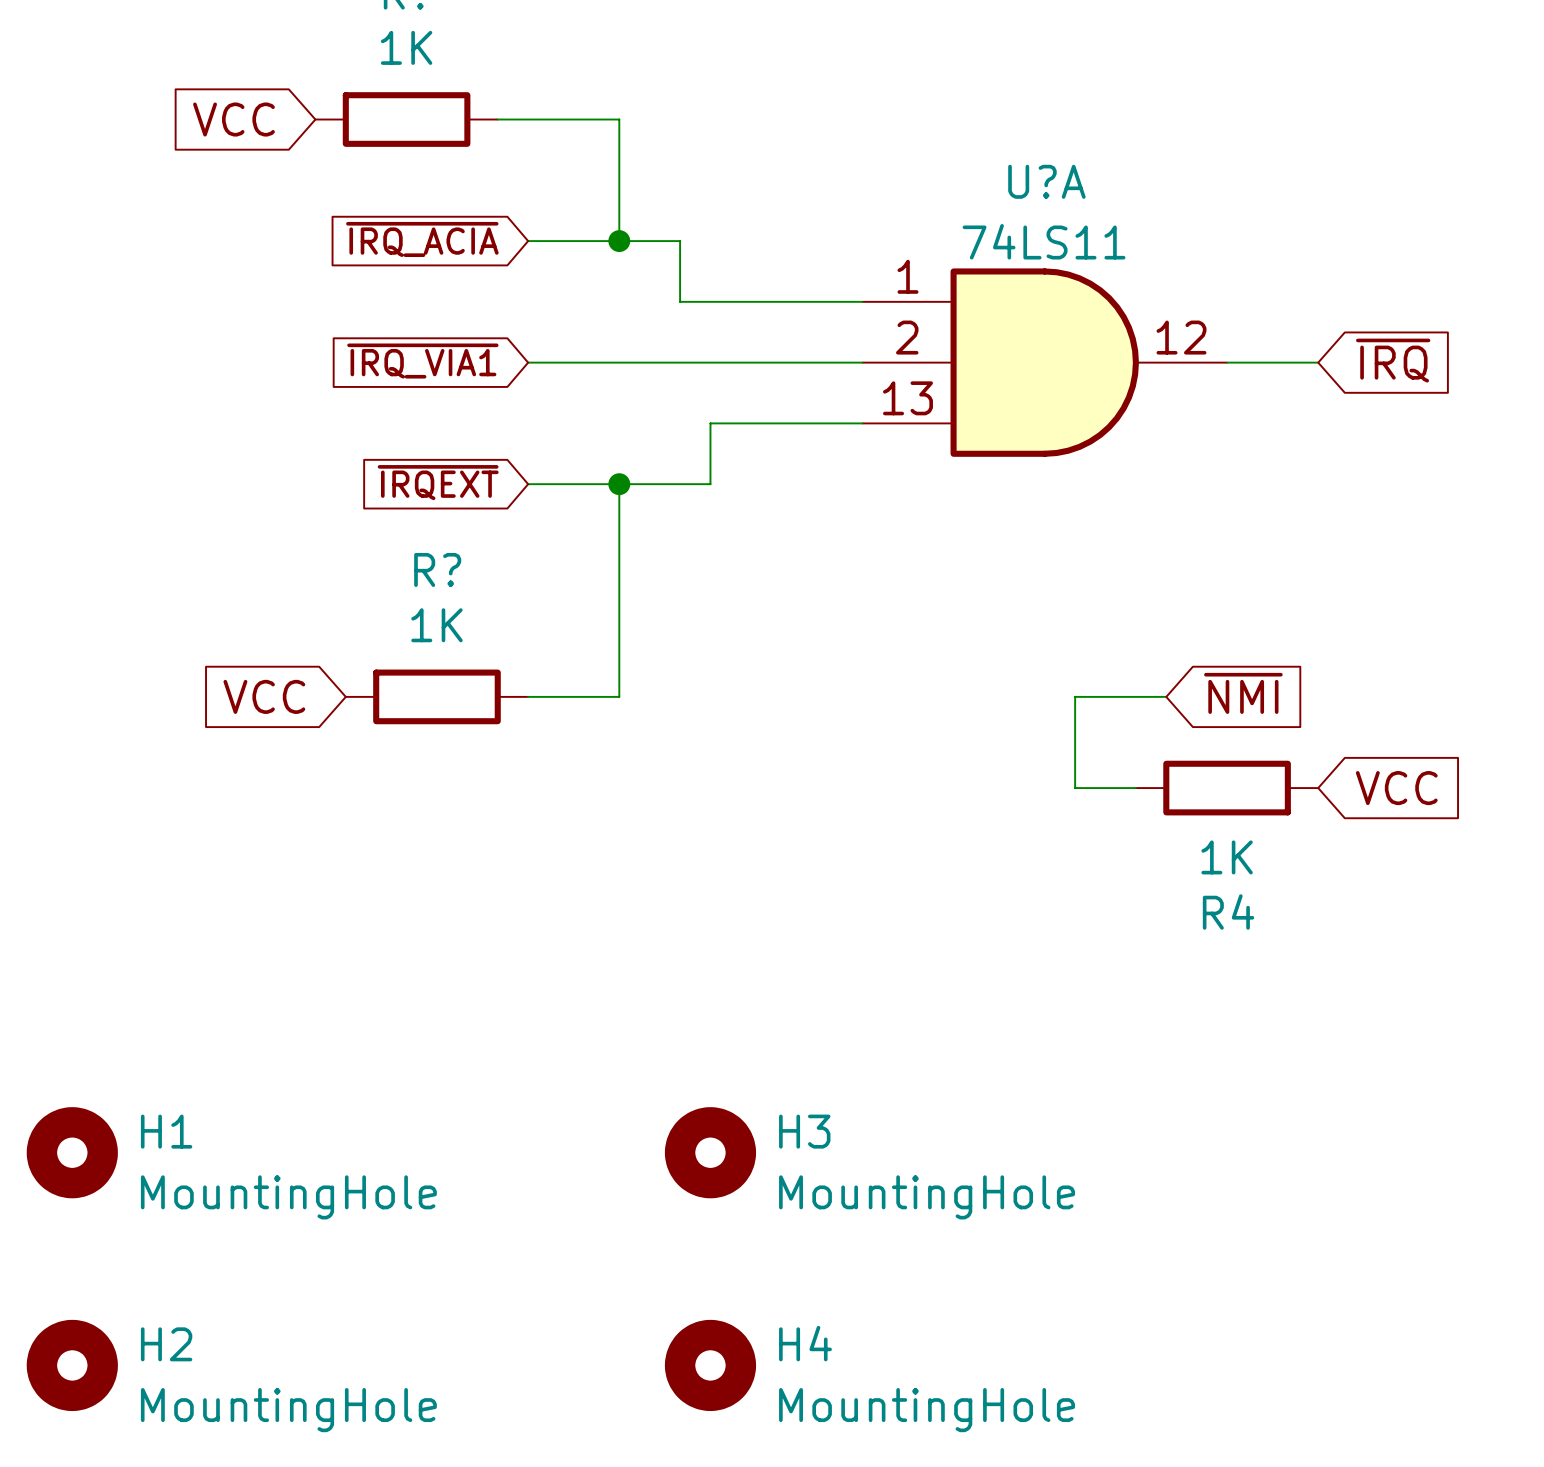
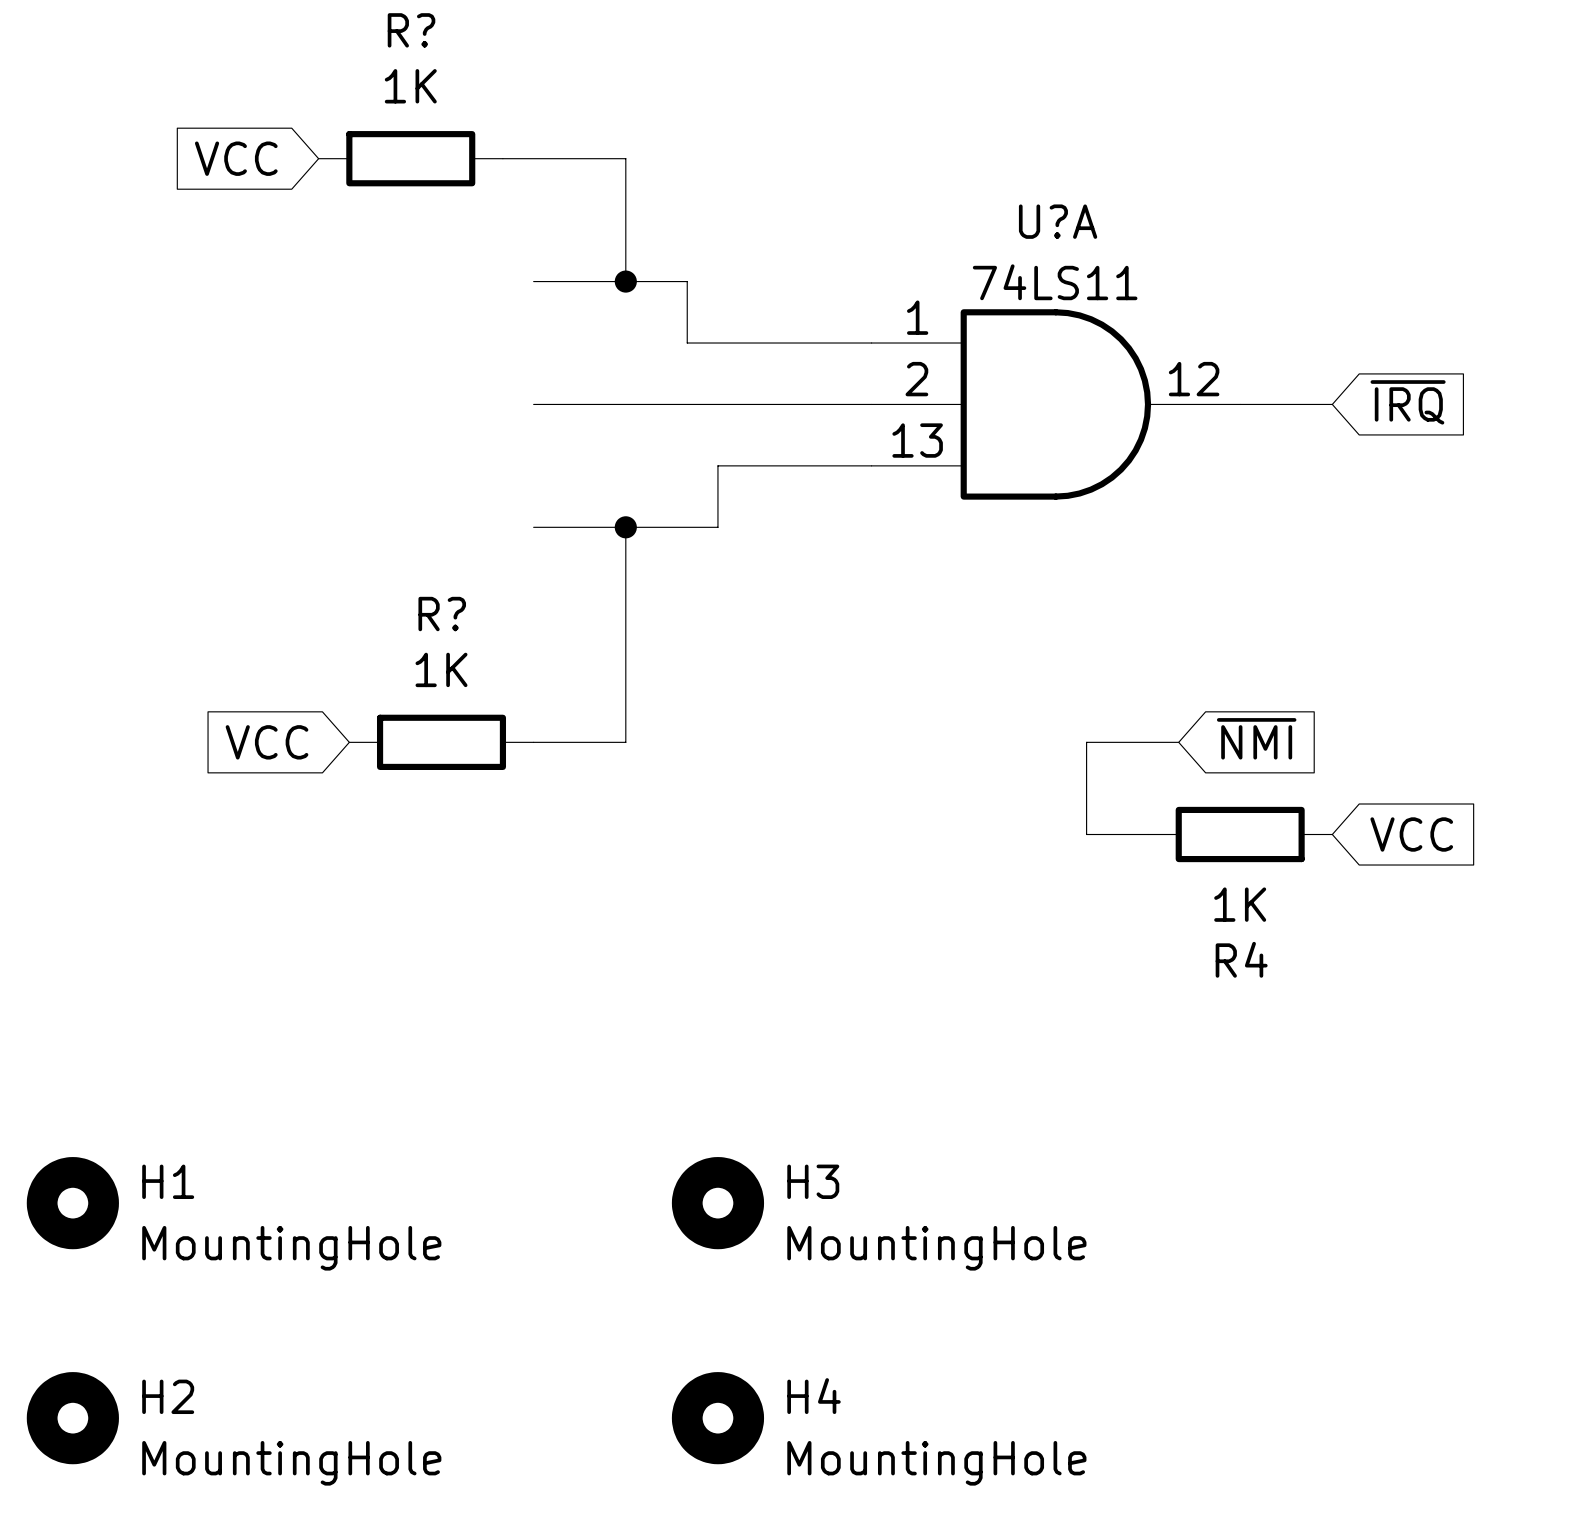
global label: ~{IRQ_ACIA} (422, 239) -> none
global label: ~{IRQ_VIA1} (422, 361) -> none
global label: ~{IRQEXT} (438, 482) -> none

